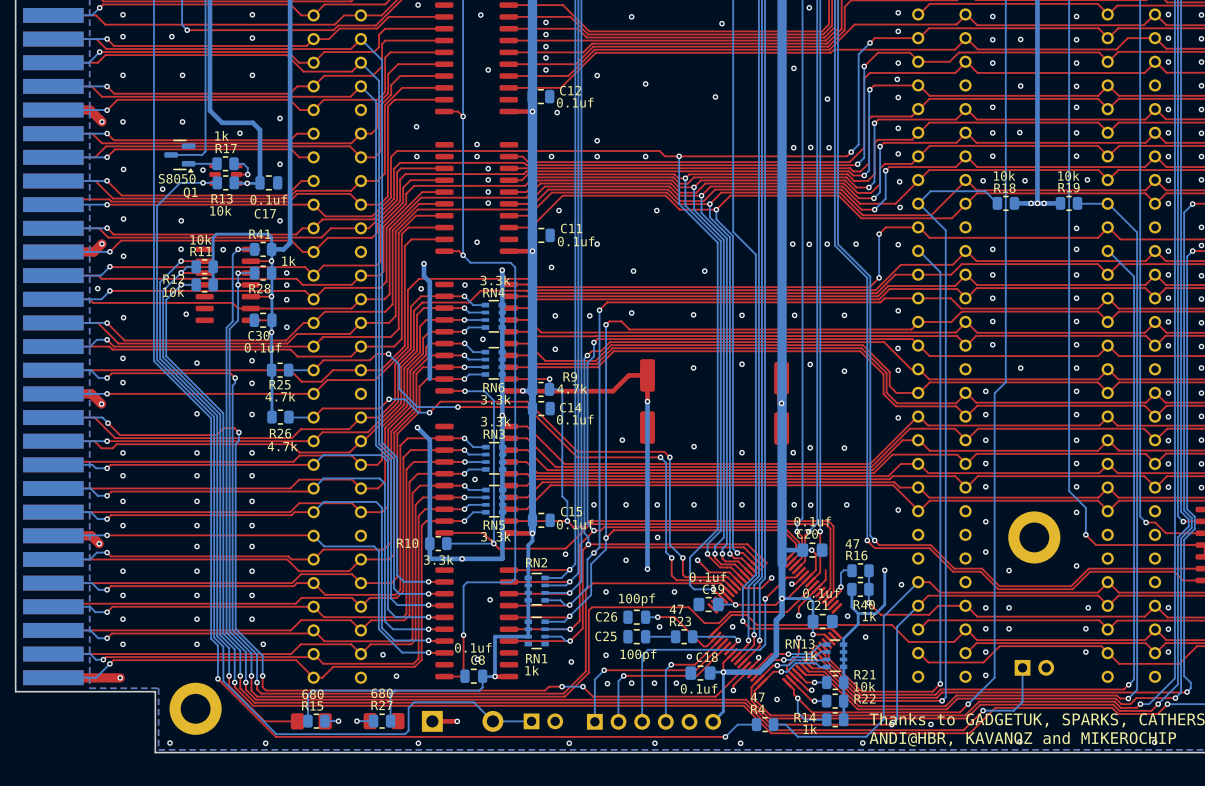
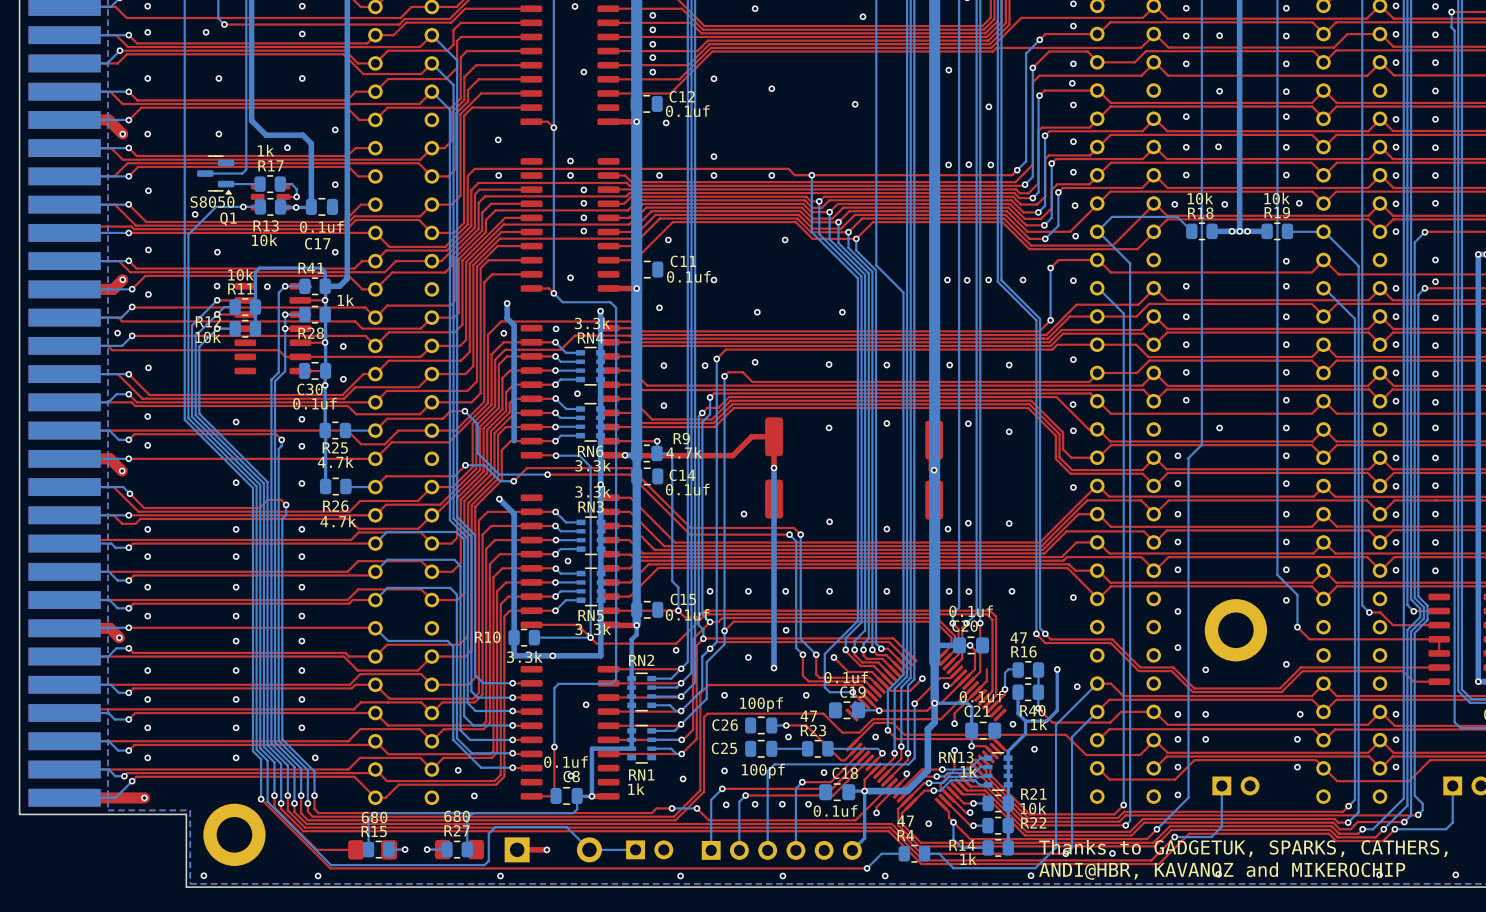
via: (202, 170) -> none
via: (286, 272) -> none
via: (286, 285) -> none
via: (186, 314) -> none

